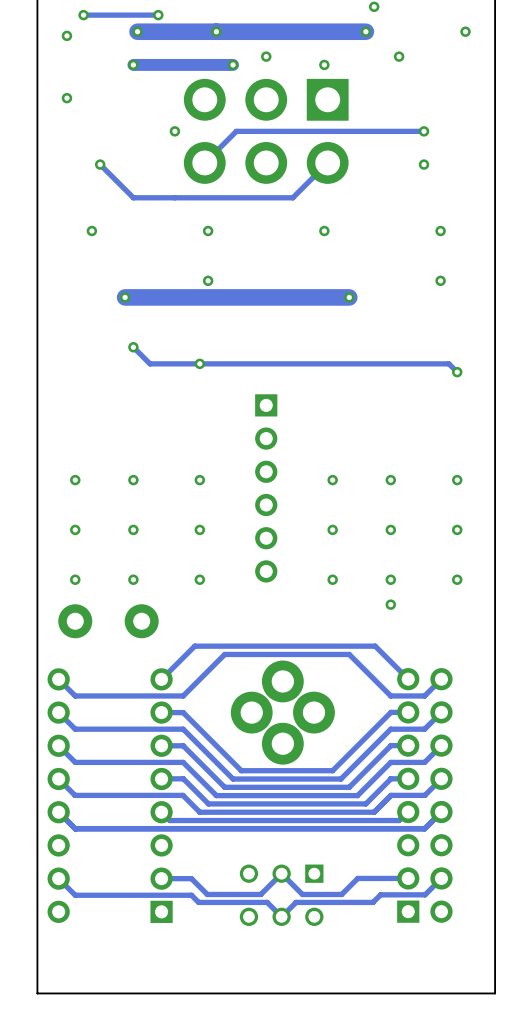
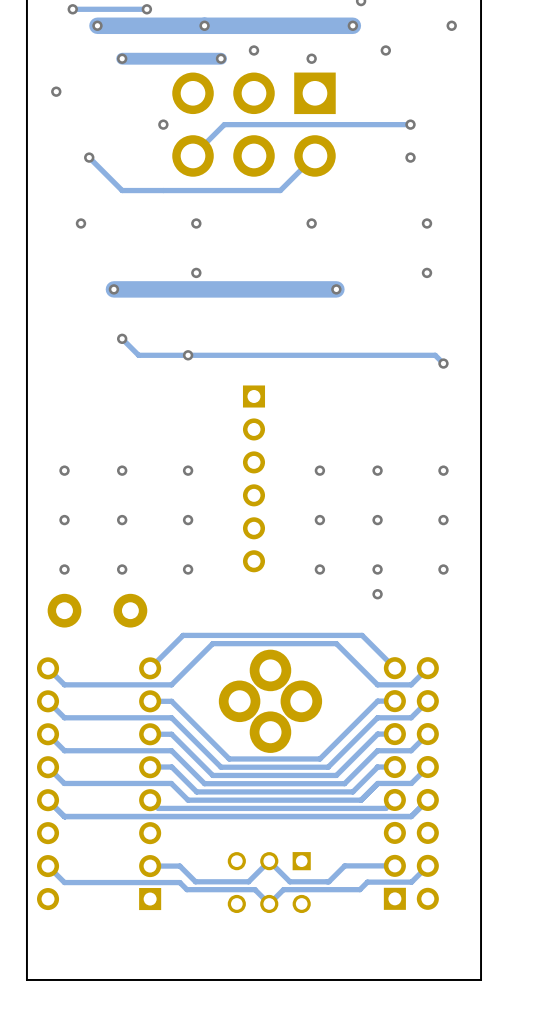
via: none -> (97, 25)
track: none -> (126, 25) (97, 25)
via: (137, 31) -> none
via: (66, 35) -> none

